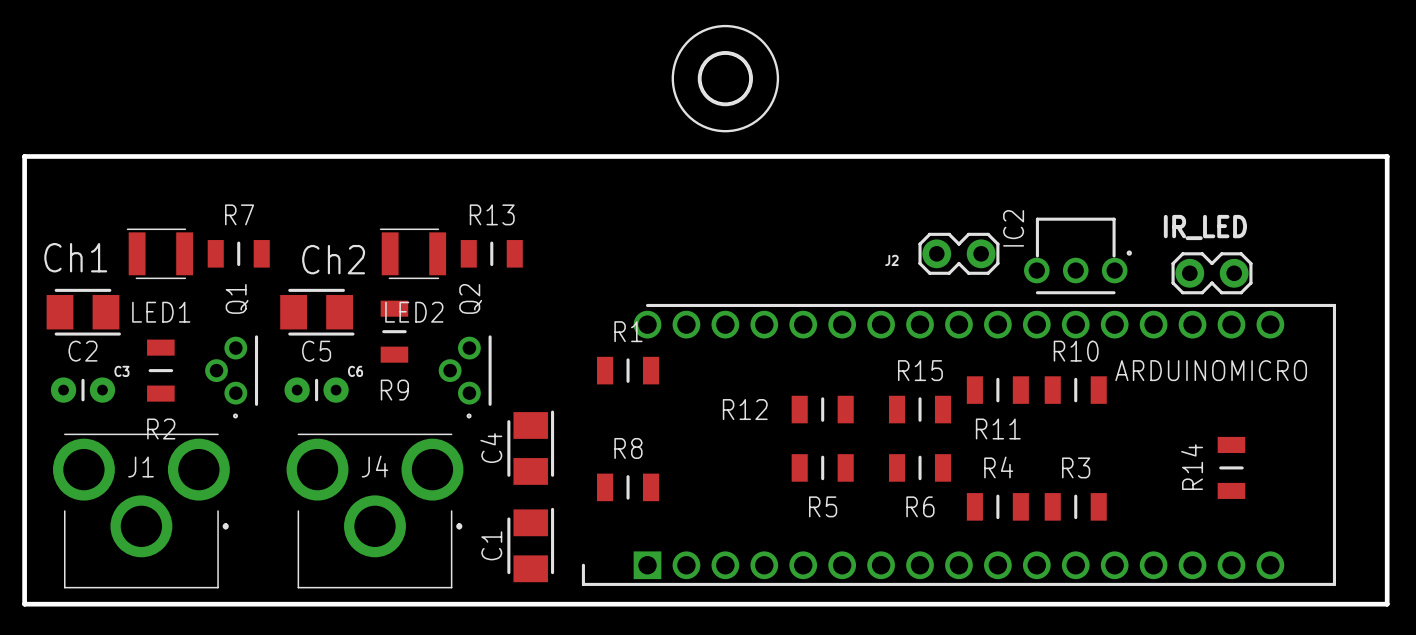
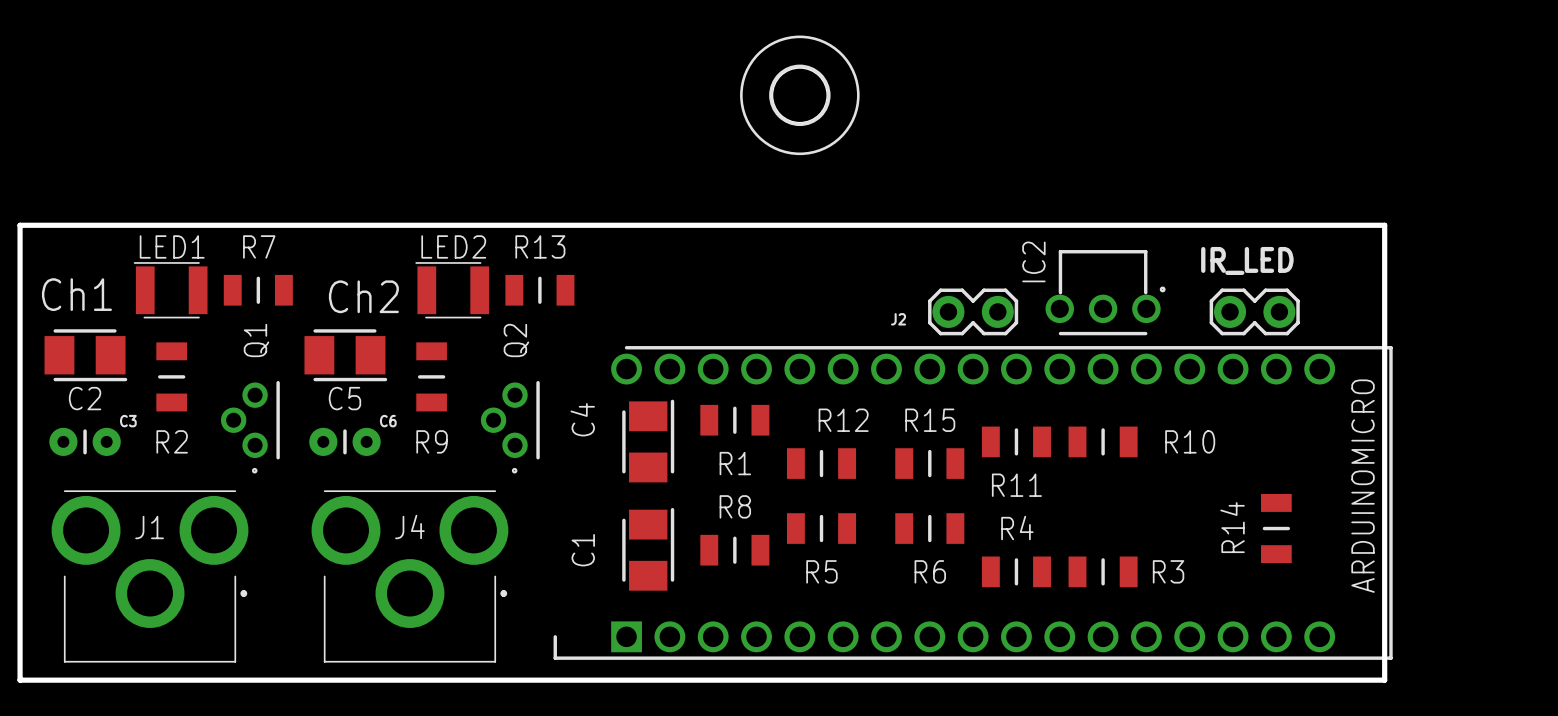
board edge: (24, 195) (24, 156) (1387, 156) (1387, 604) (1250, 604) -> (20, 225) (1384, 225) (1384, 680)
J2 position: (958, 253) -> (973, 311)
IC2 position: (1077, 255) -> (1105, 292)
IR_LED position: (1212, 273) -> (1254, 311)
LED1 name position: LED1 (161, 312) -> LED1 (172, 246)
LED2 name position: LED2 (414, 312) -> LED2 (453, 246)
R1 name position: R1 (628, 331) -> R1 (735, 463)
R2 position: (160, 370) -> (171, 376)
R1 position: (628, 370) -> (734, 420)
ARDUINOMICRO name rotation: 0° (1211, 370) -> 90° counterclockwise (1363, 486)
R11: none -> (1016, 441)
R10: (1075, 390) -> none
R12 name position: R12 (745, 409) -> R12 (843, 420)
R12 position: (822, 409) -> (821, 463)
R15 position: (920, 409) -> (929, 463)
R11 name: R11 (998, 429) -> R10 (1190, 441)
ARDUINOMICRO position: (958, 444) -> (973, 502)
C4 position: (530, 447) -> (648, 441)
C4 name position: C4 (491, 448) -> C4 (582, 419)
R5 position: (822, 467) -> (821, 528)
R6 position: (920, 467) -> (929, 528)
R4 name: R4 (998, 467) -> R3 (1168, 571)
R14 position: (1231, 467) -> (1276, 528)
R8 position: (628, 487) -> (734, 550)
R4: none -> (1016, 571)
R3: (1075, 506) -> none
C1 name position: C1 (491, 545) -> C1 (583, 550)
C1 position: (530, 545) -> (648, 549)

